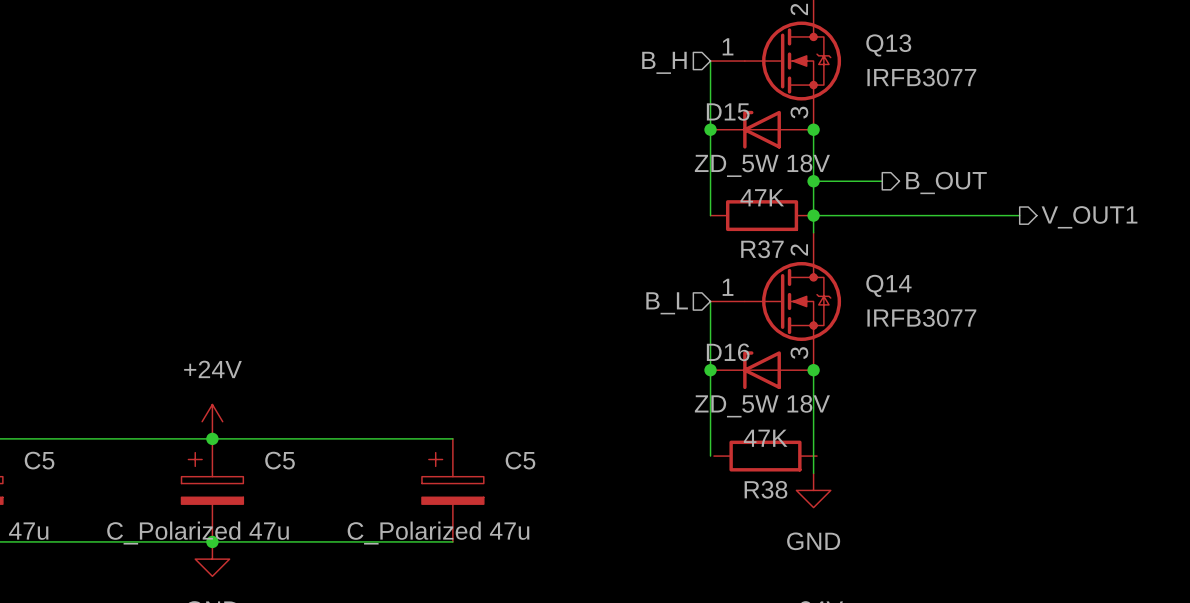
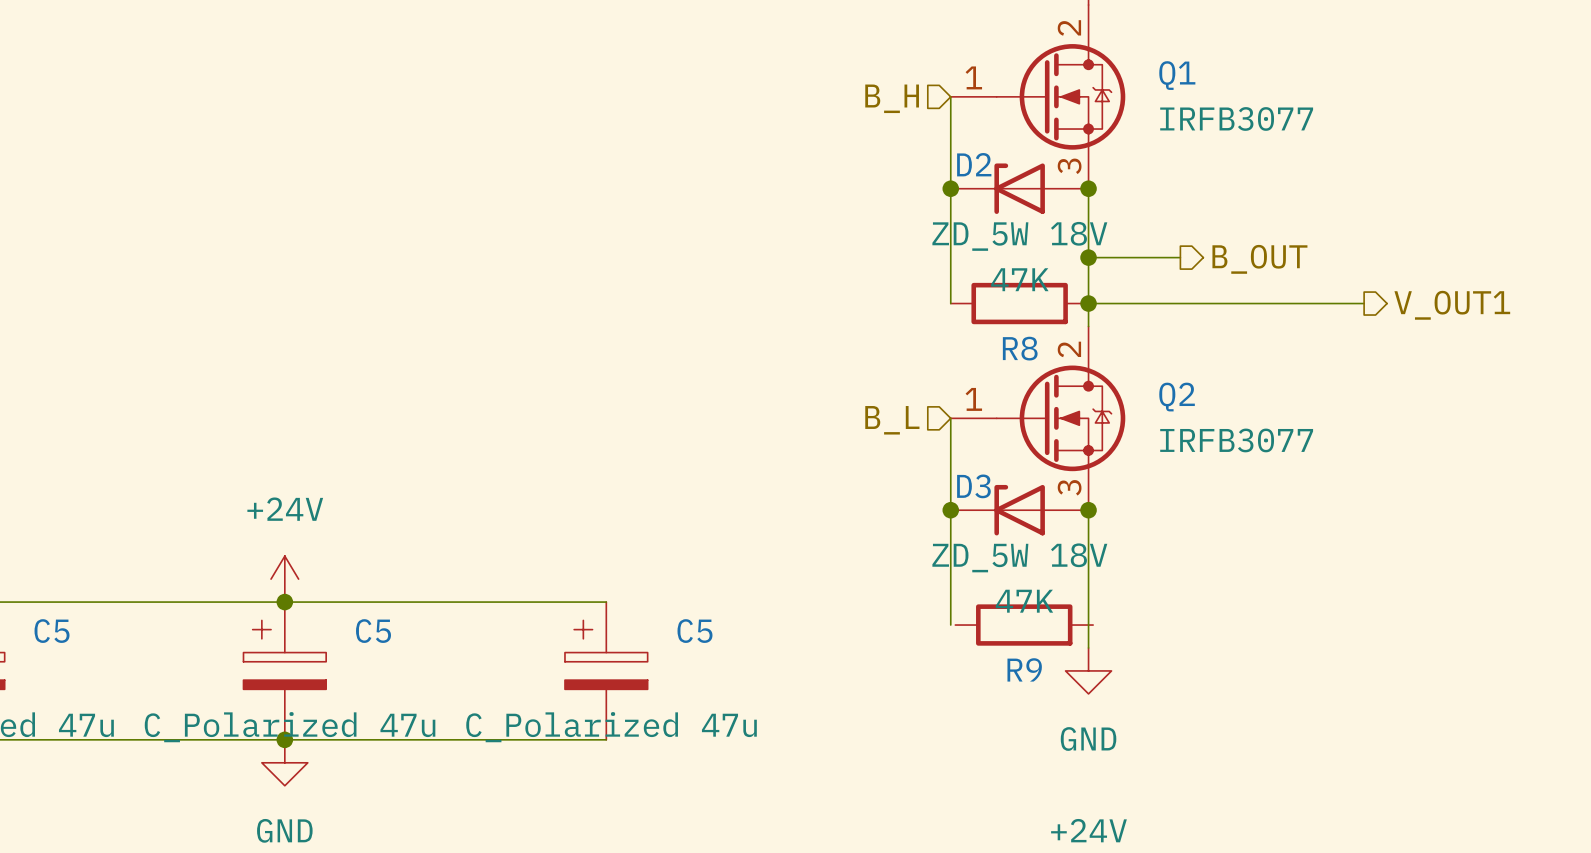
Q13 name: Q13 (888, 45) -> Q1 (1177, 75)
D15 name: D15 (728, 112) -> D2 (974, 164)
R37 name: R37 (762, 249) -> R8 (1020, 348)
Q14 name: Q14 (888, 285) -> Q2 (1177, 397)
D16 name: D16 (728, 352) -> D3 (973, 486)
R38 name: R38 (765, 489) -> R9 (1024, 669)

